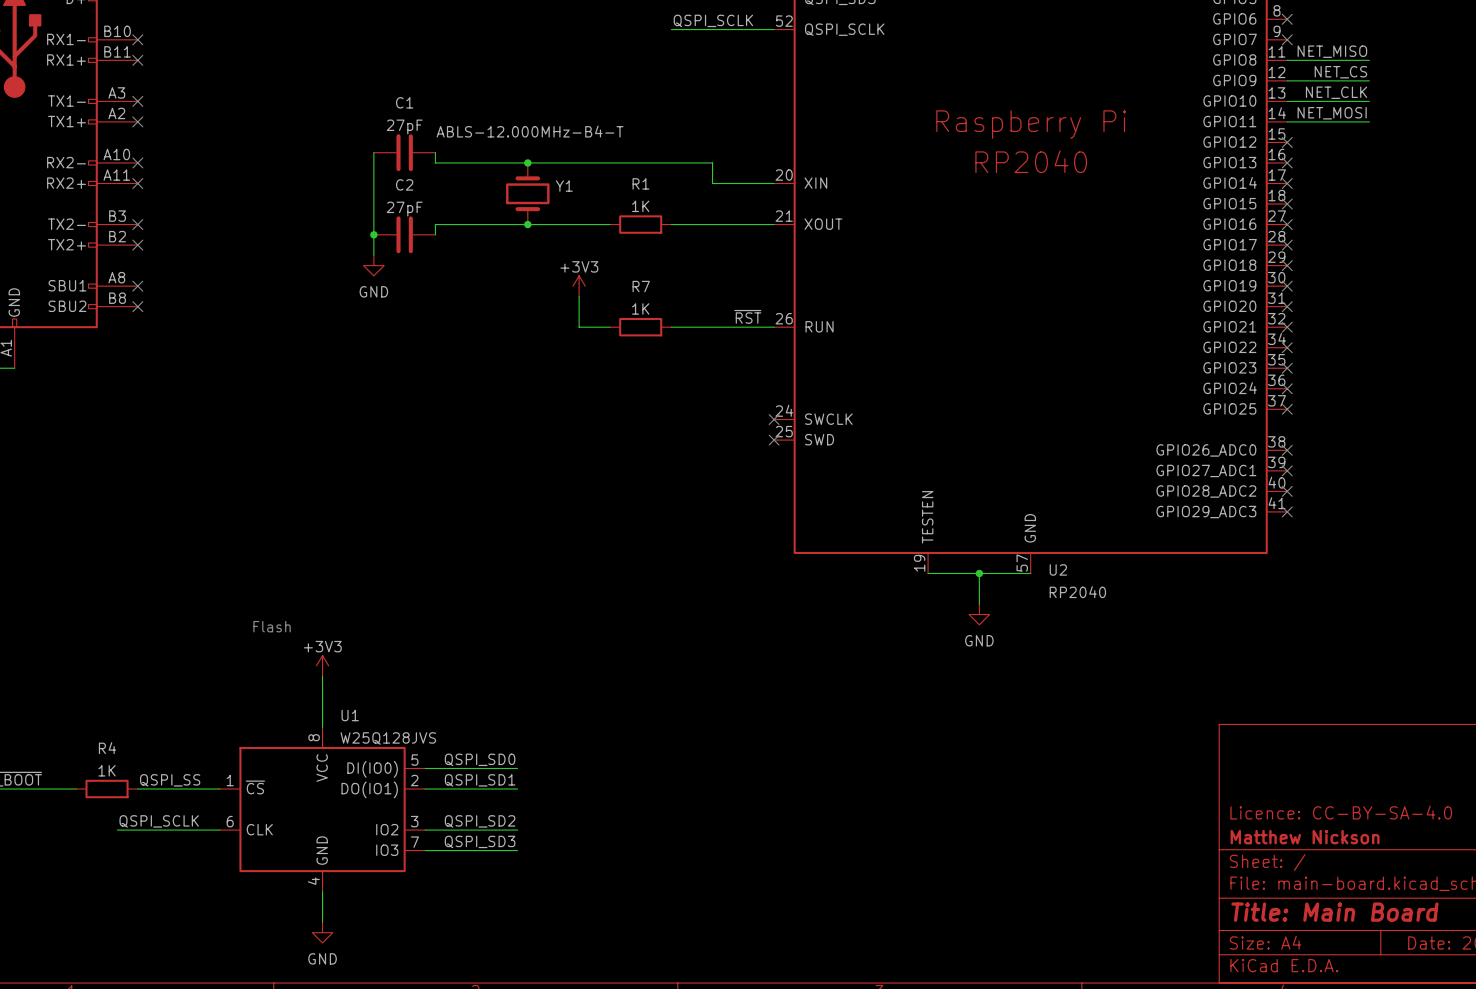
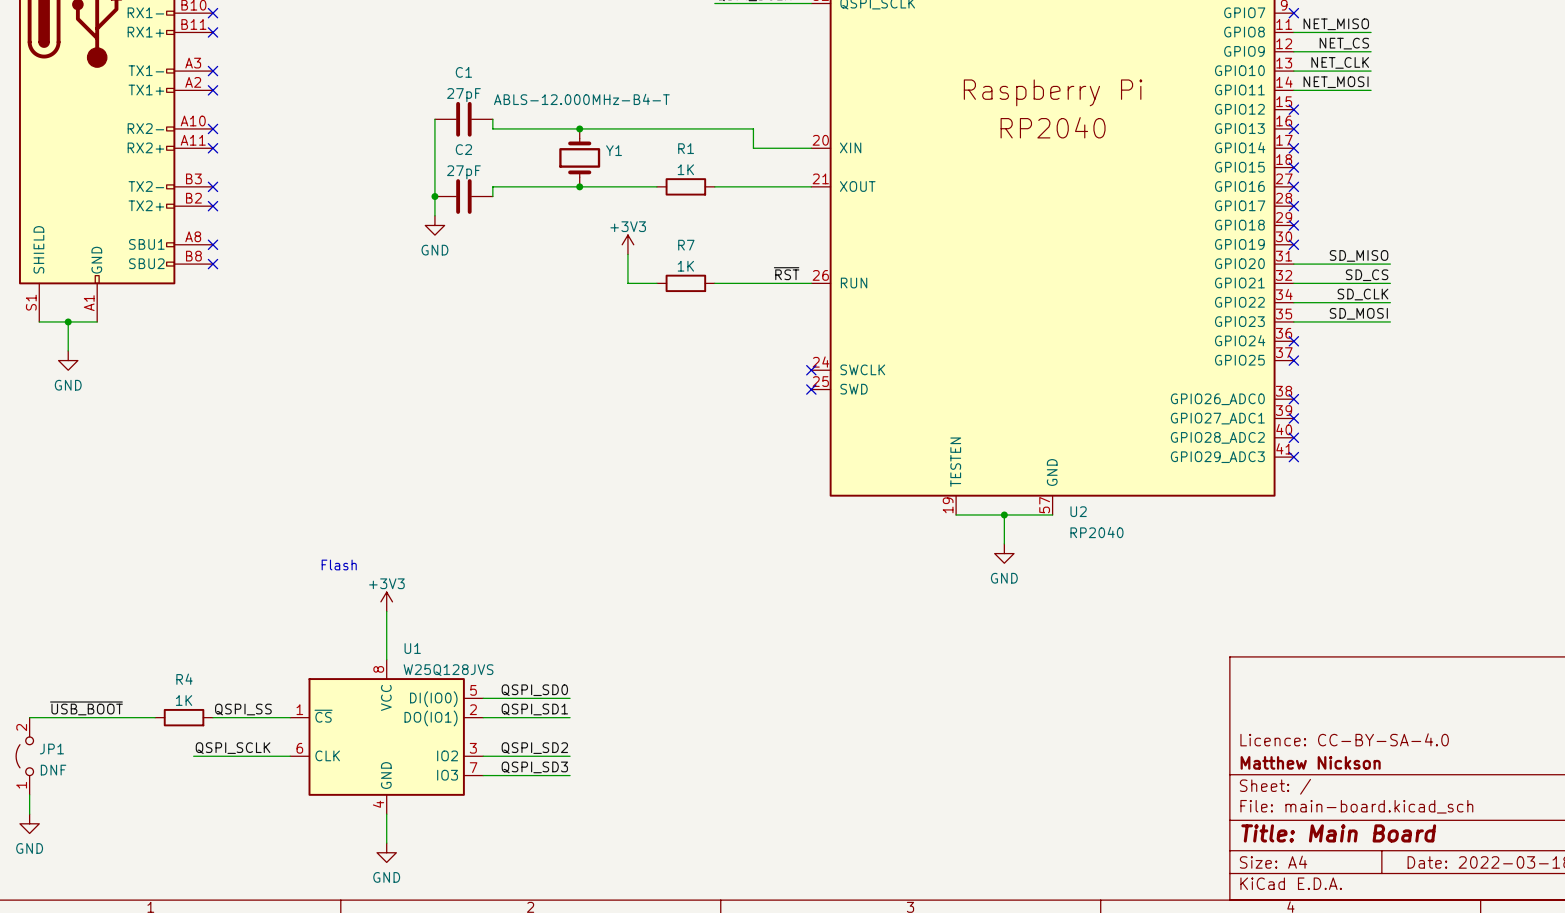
label: none -> SD_MISO (1359, 255)
wire: none -> (1293, 264) (1390, 264)
no-connect mark: (1287, 306) -> none
label: none -> SD_CS (1367, 275)
wire: none -> (1293, 283) (1390, 283)
no-connect mark: (1287, 327) -> none
label: none -> SD_CLK (1362, 294)
wire: none -> (1293, 302) (1390, 302)
no-connect mark: (1287, 347) -> none
label: none -> SD_MOSI (1358, 313)
wire: none -> (1293, 321) (1390, 321)
no-connect mark: (1287, 368) -> none

